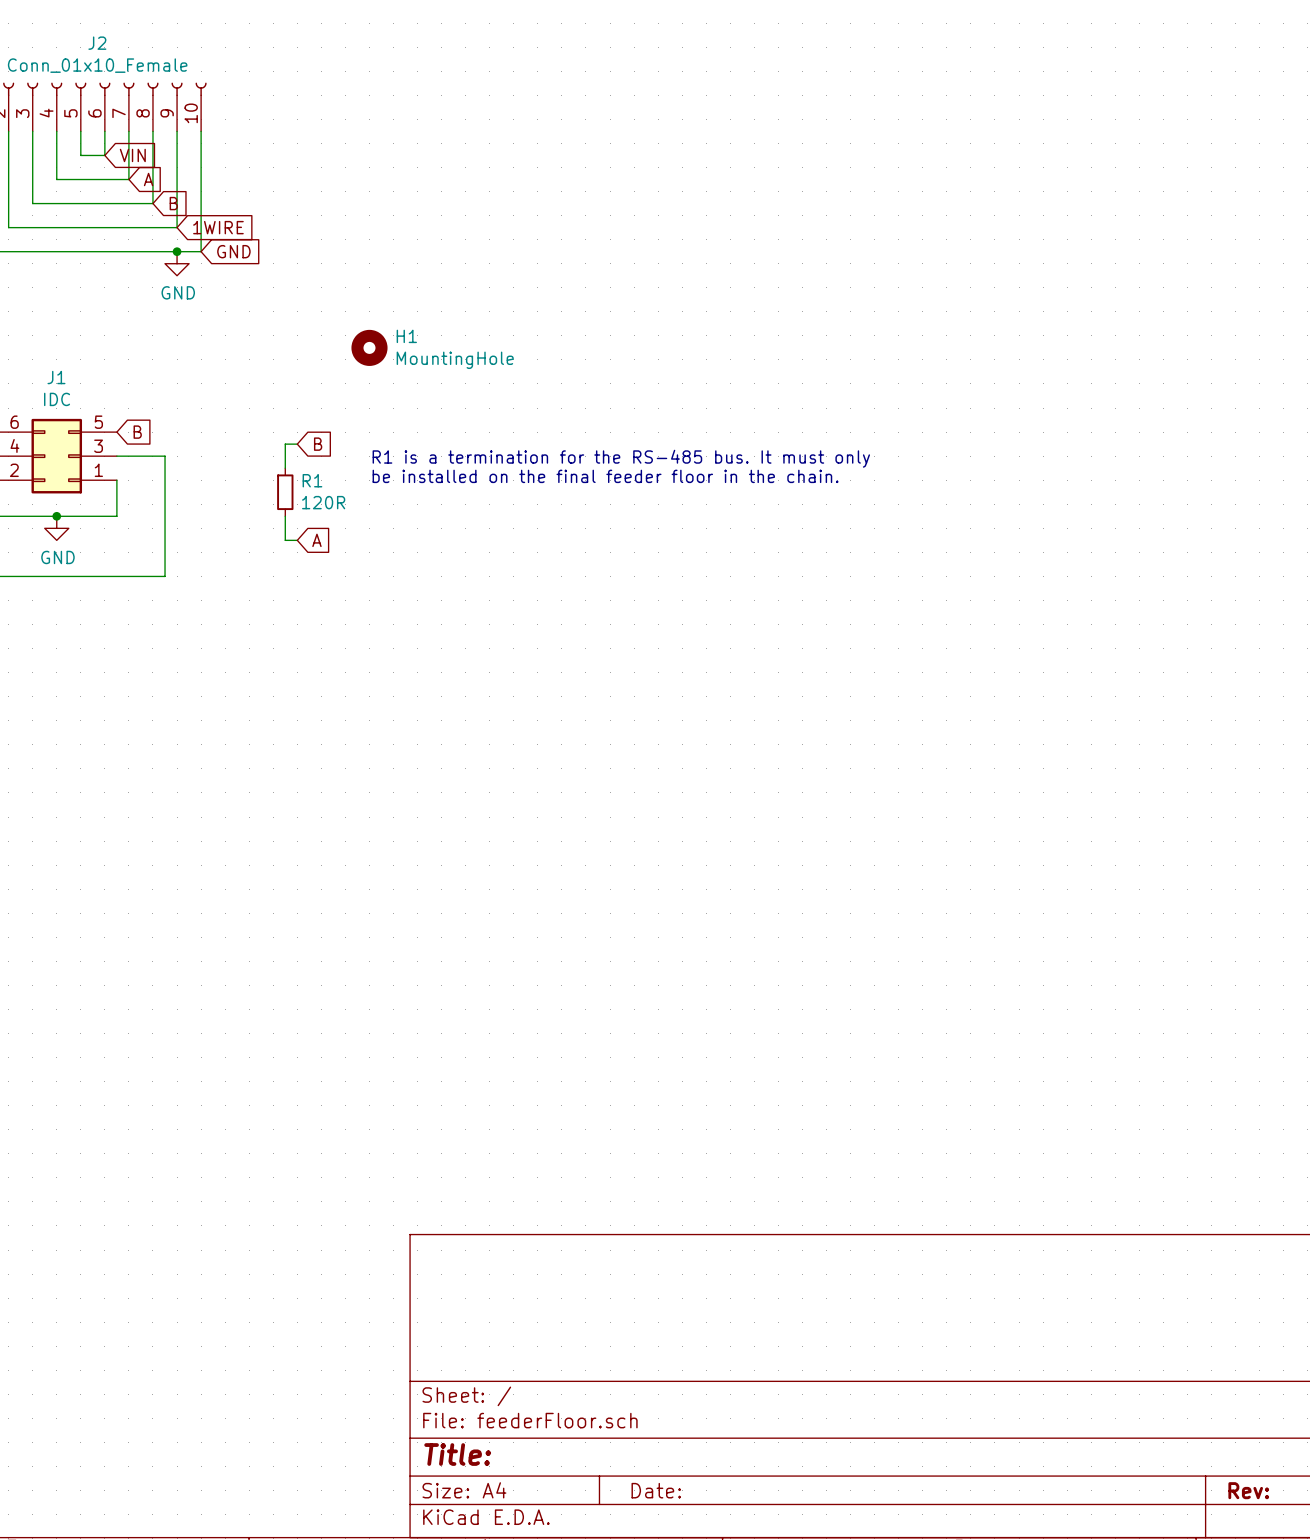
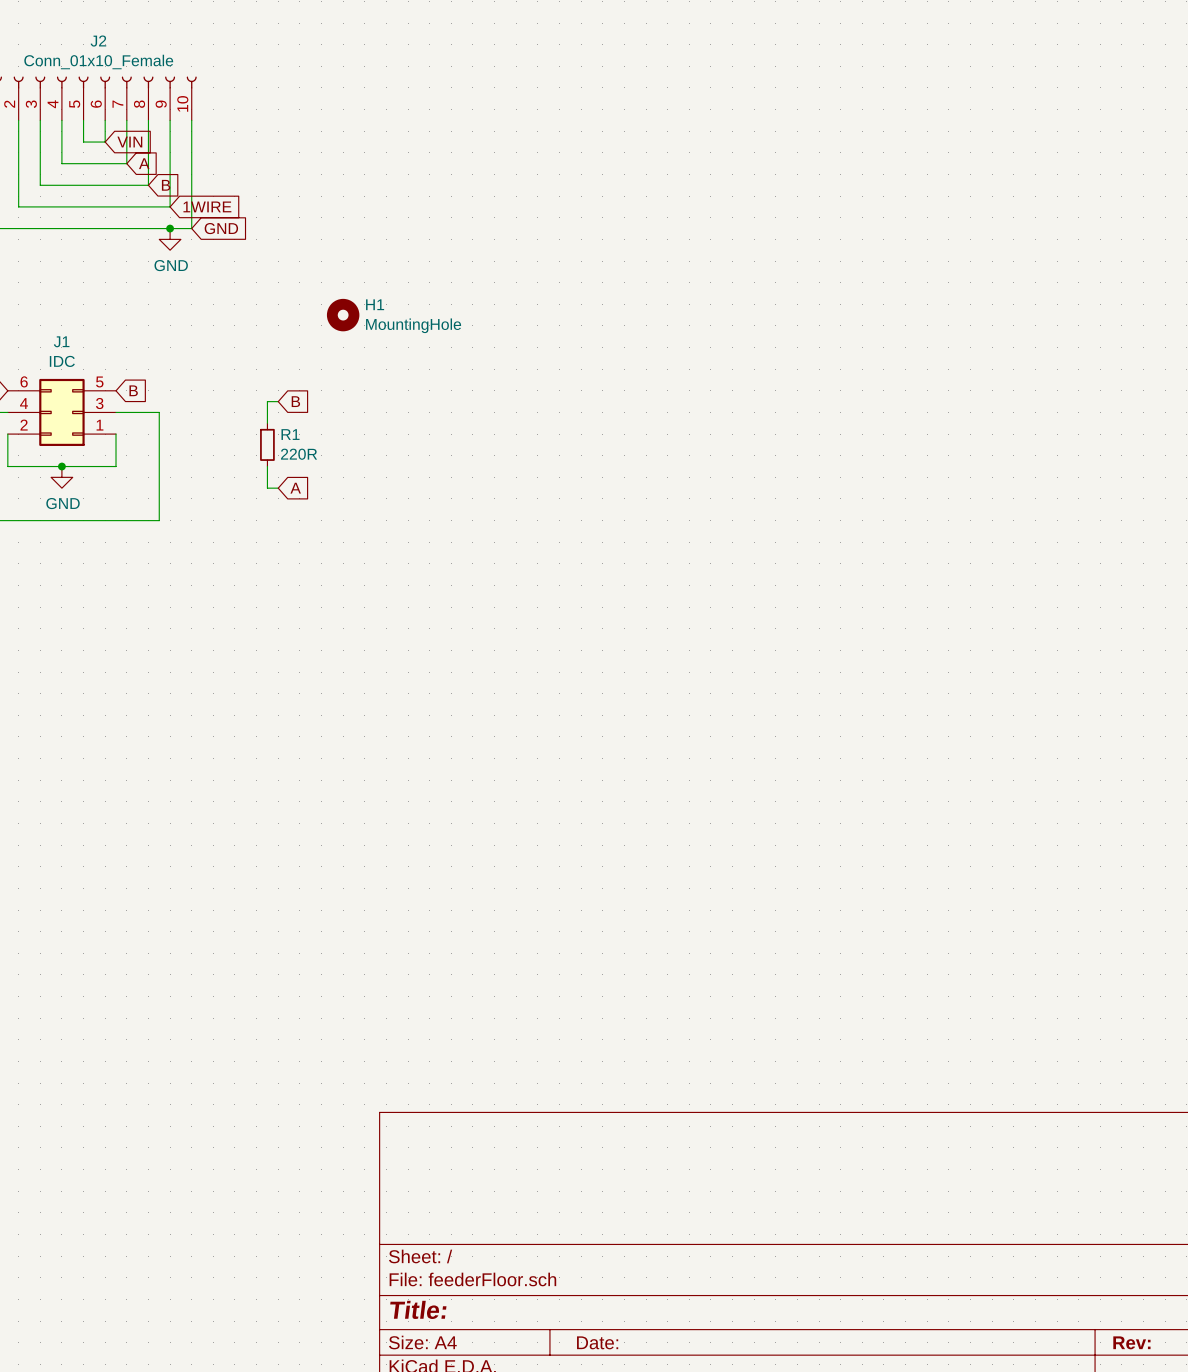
text: R1 is a termination for the RS-485 bus. It must only (621, 458) -> none
text: be installed on the final feeder floor in the chain. (605, 476) -> none
R1 value: 120R (323, 502) -> 220R (299, 454)

